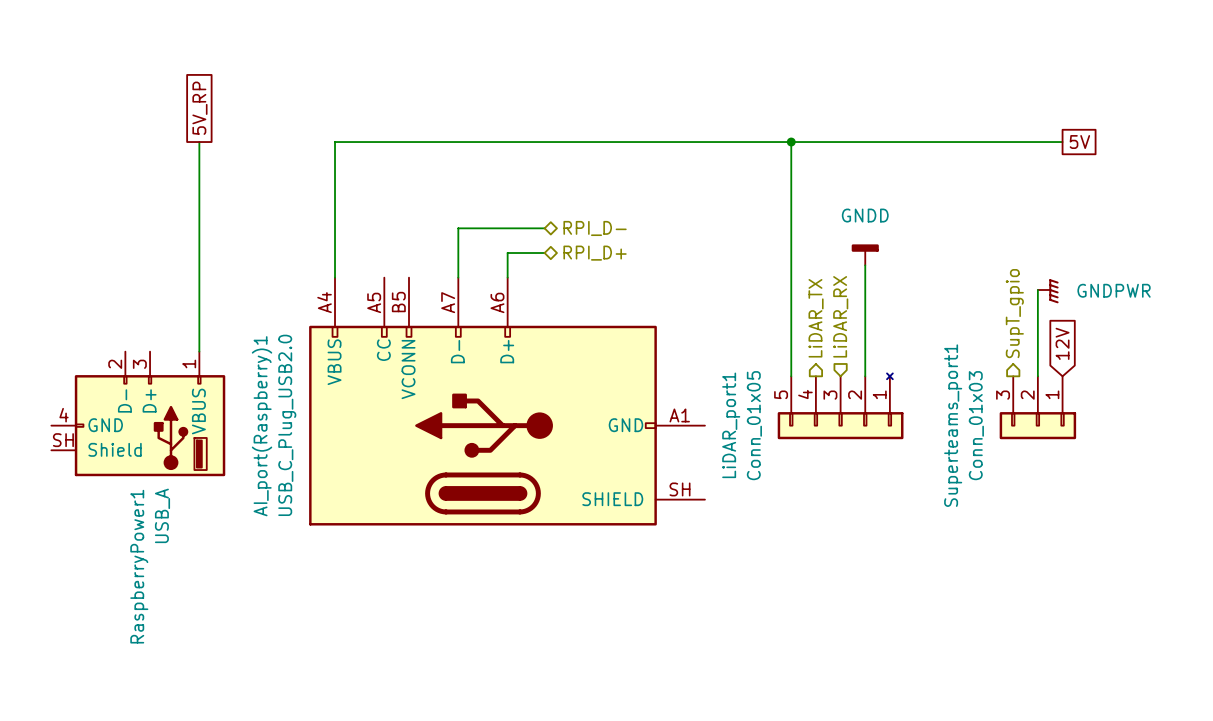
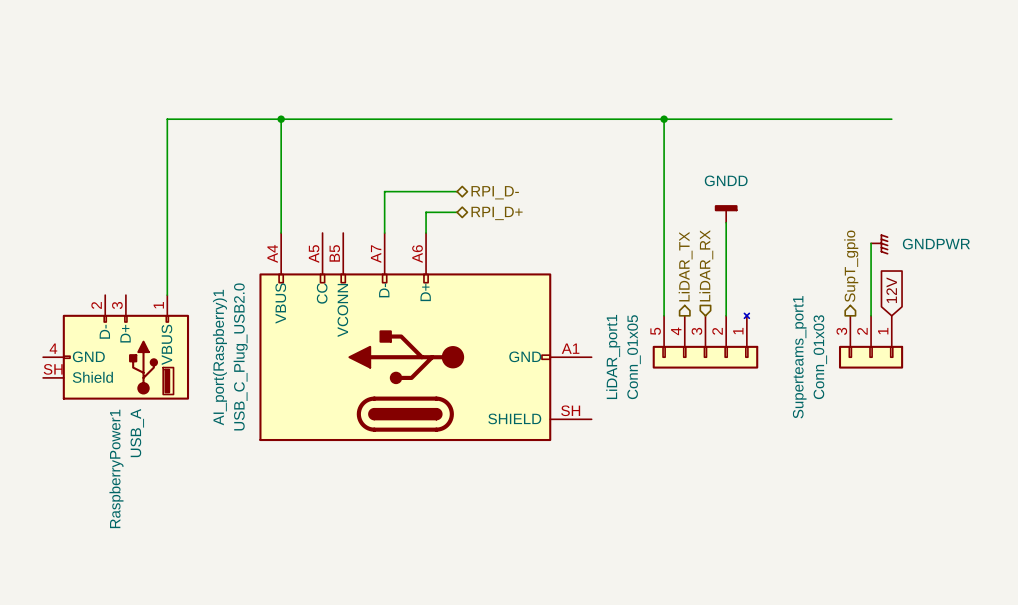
global label: 5V_RP (199, 108) -> none
wire: none -> (167, 119) (281, 119)
junction: none -> (281, 119)
global label: 5V (1079, 142) -> none

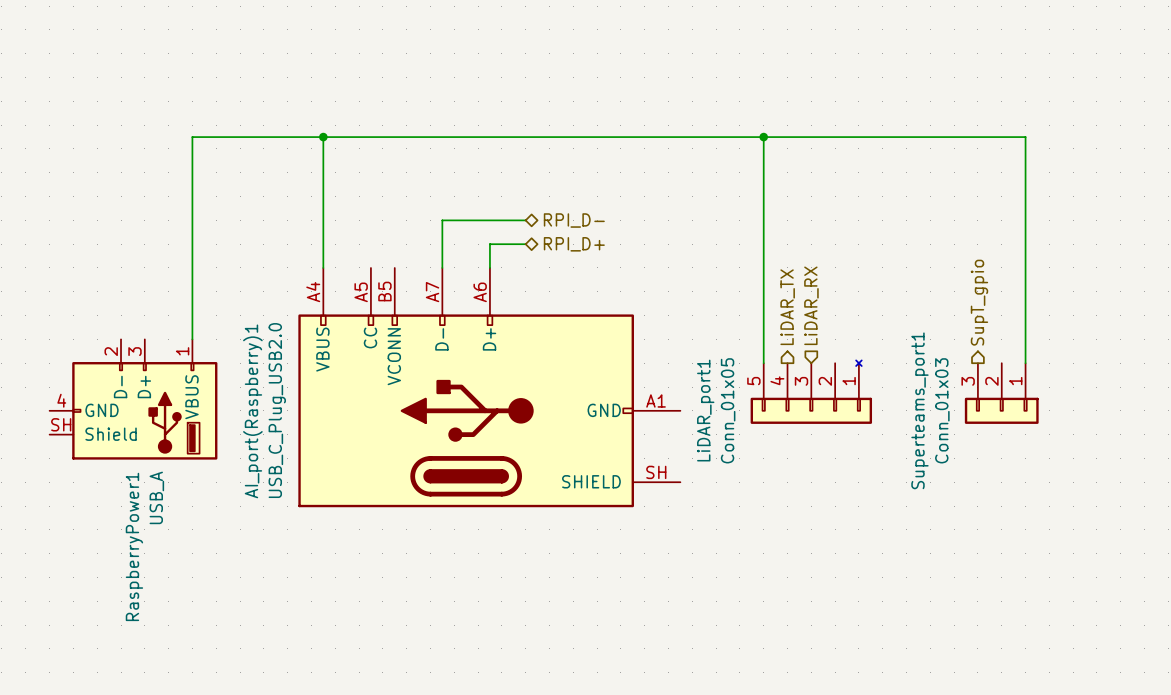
wire: none -> (1025, 137) (1025, 363)
power symbol: GNDD (726, 213) -> none
wire: (726, 222) (726, 315) -> none
wire: (871, 243) (871, 315) -> none
power symbol: GNDPWR (879, 244) -> none
global label: 12V (891, 290) -> none

